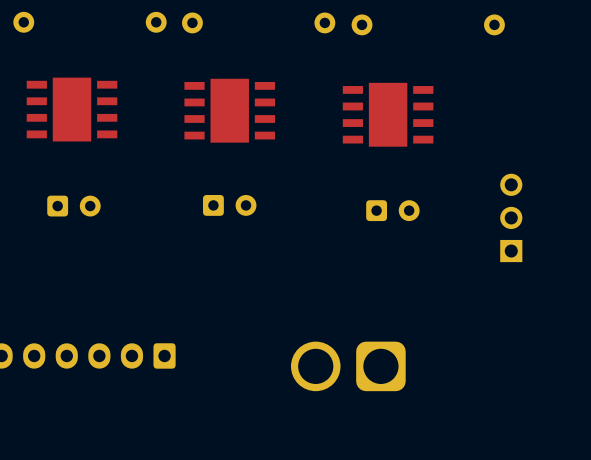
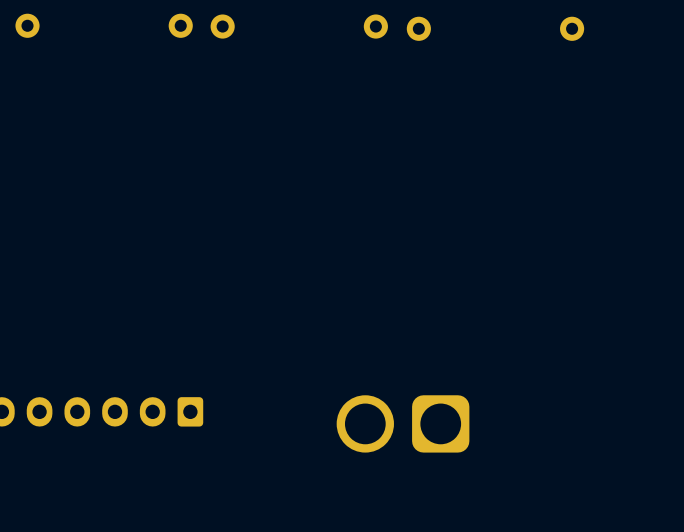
part: (72, 109) -> none
part: (229, 110) -> none
part: (388, 114) -> none
part: (229, 205) -> none
part: (73, 206) -> none
part: (392, 210) -> none
part: (511, 217) -> none

